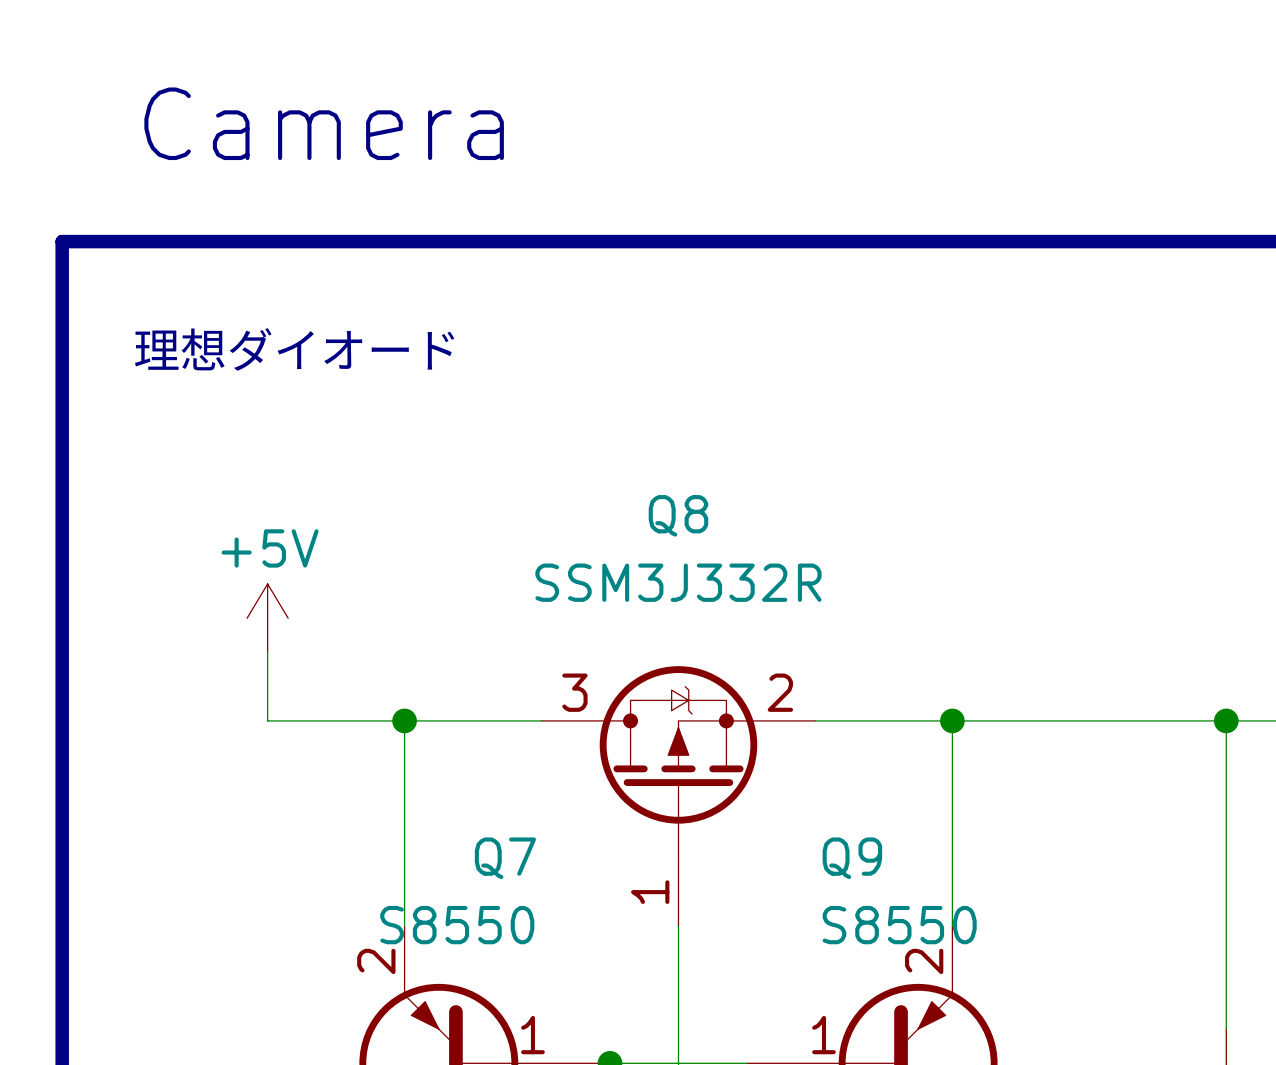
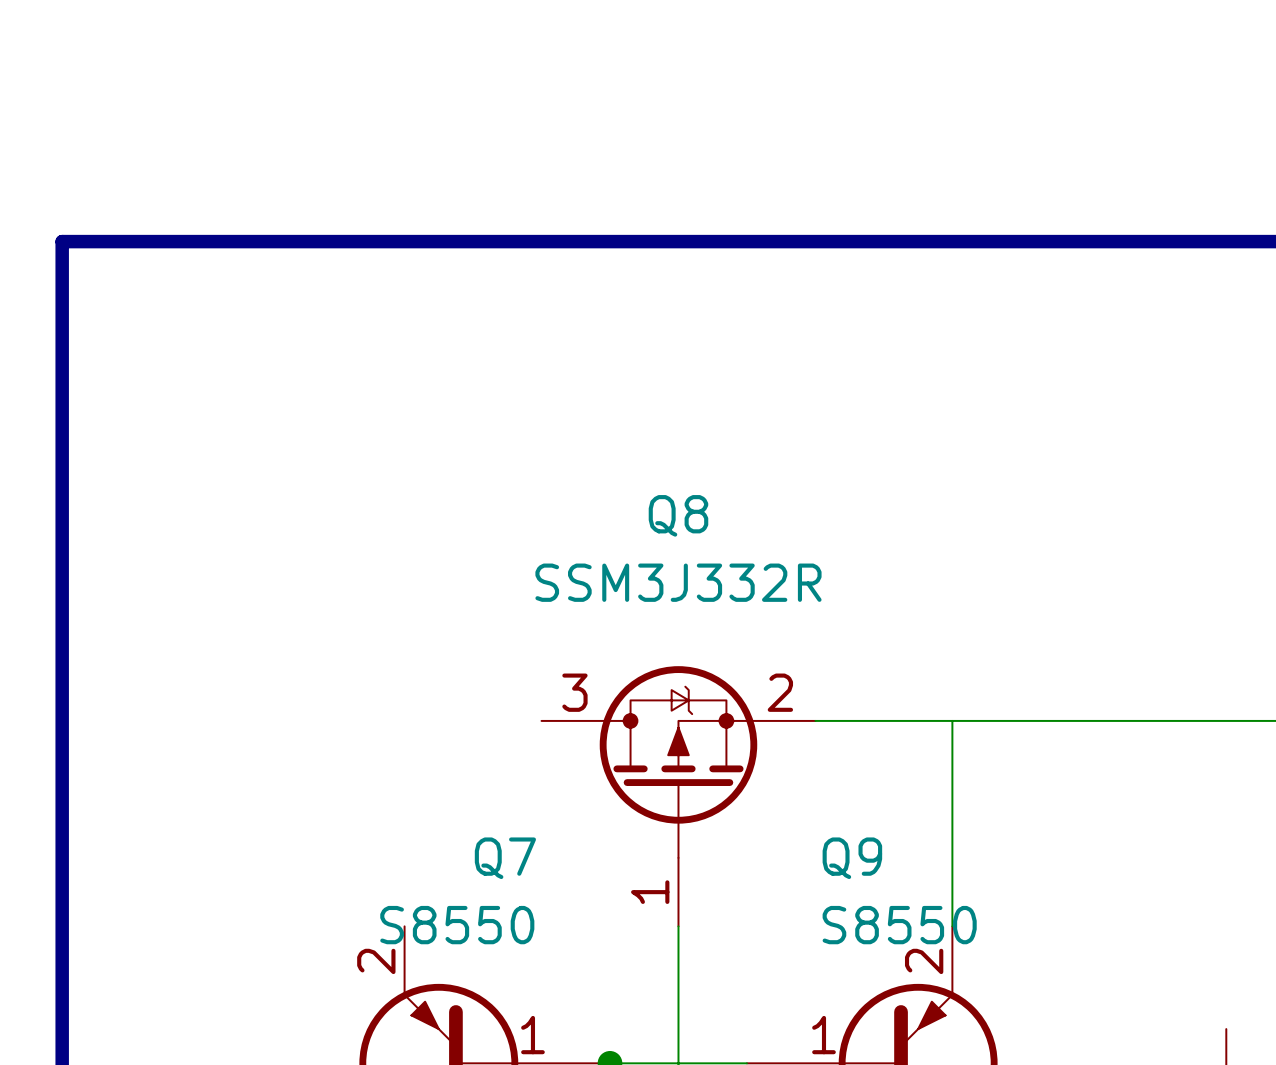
text: Camera (324, 123) -> none
text: 理想ダイオード (294, 349) -> none
power symbol: +5V (267, 618) -> none
wire: (267, 652) (267, 720) (541, 720) -> none
wire: (404, 720) (404, 926) -> none
junction: (404, 720) -> none
junction: (952, 720) -> none
wire: (1226, 720) (1226, 1029) -> none
junction: (1226, 720) -> none

